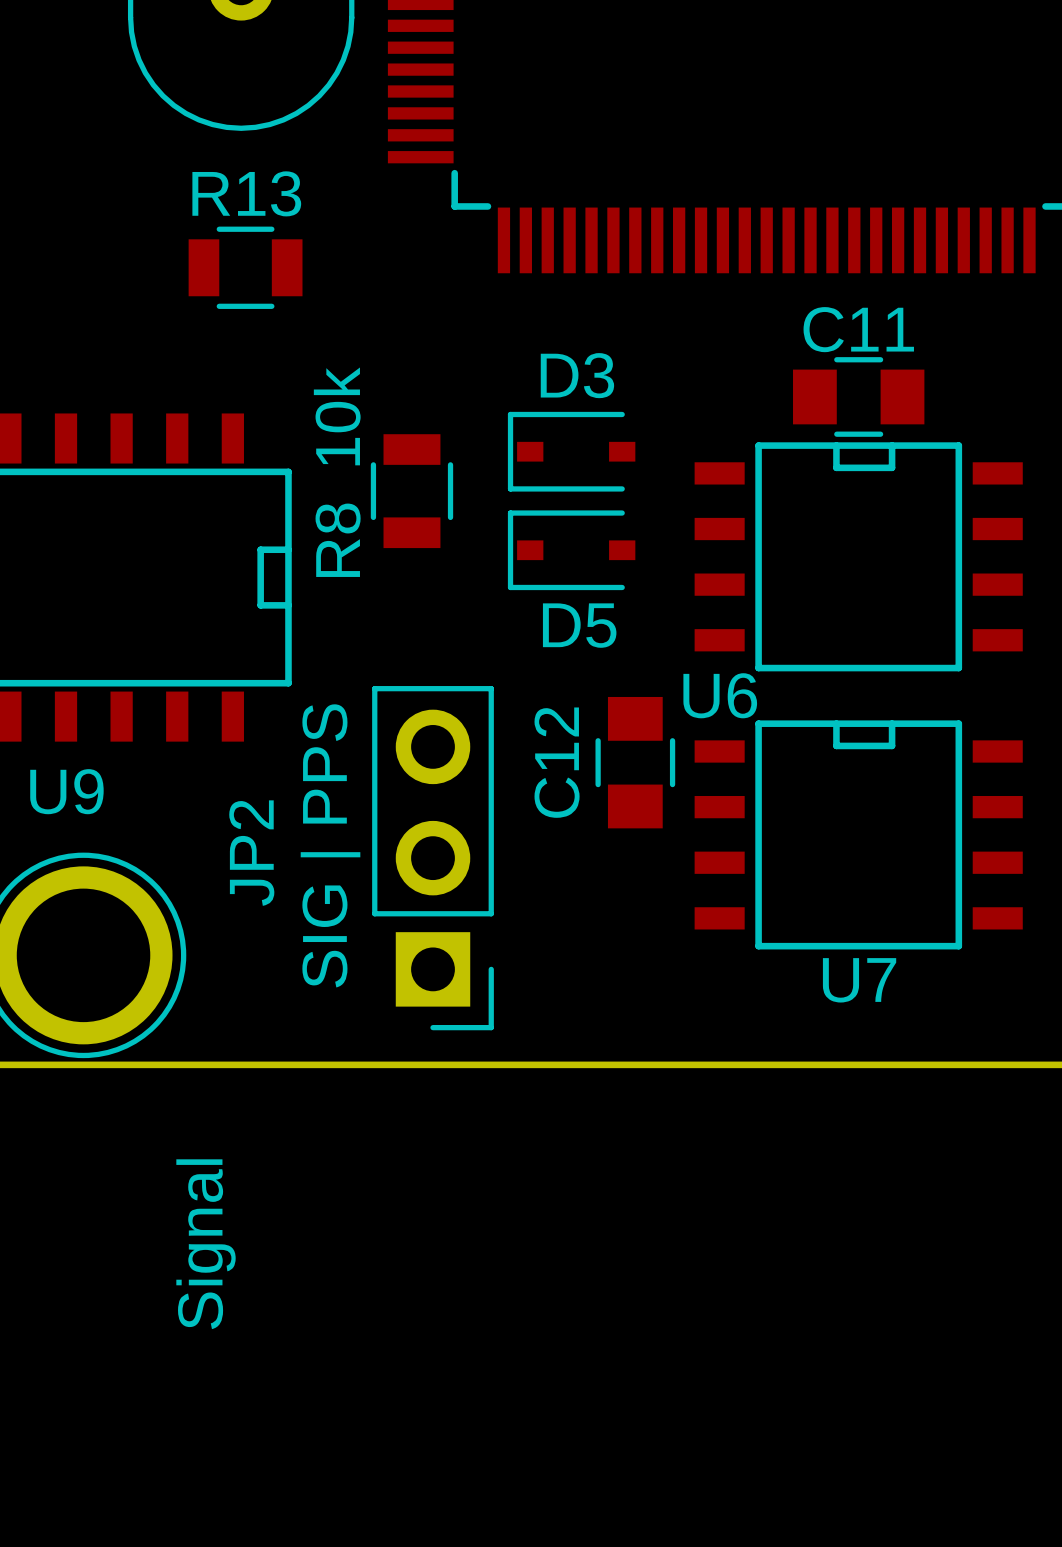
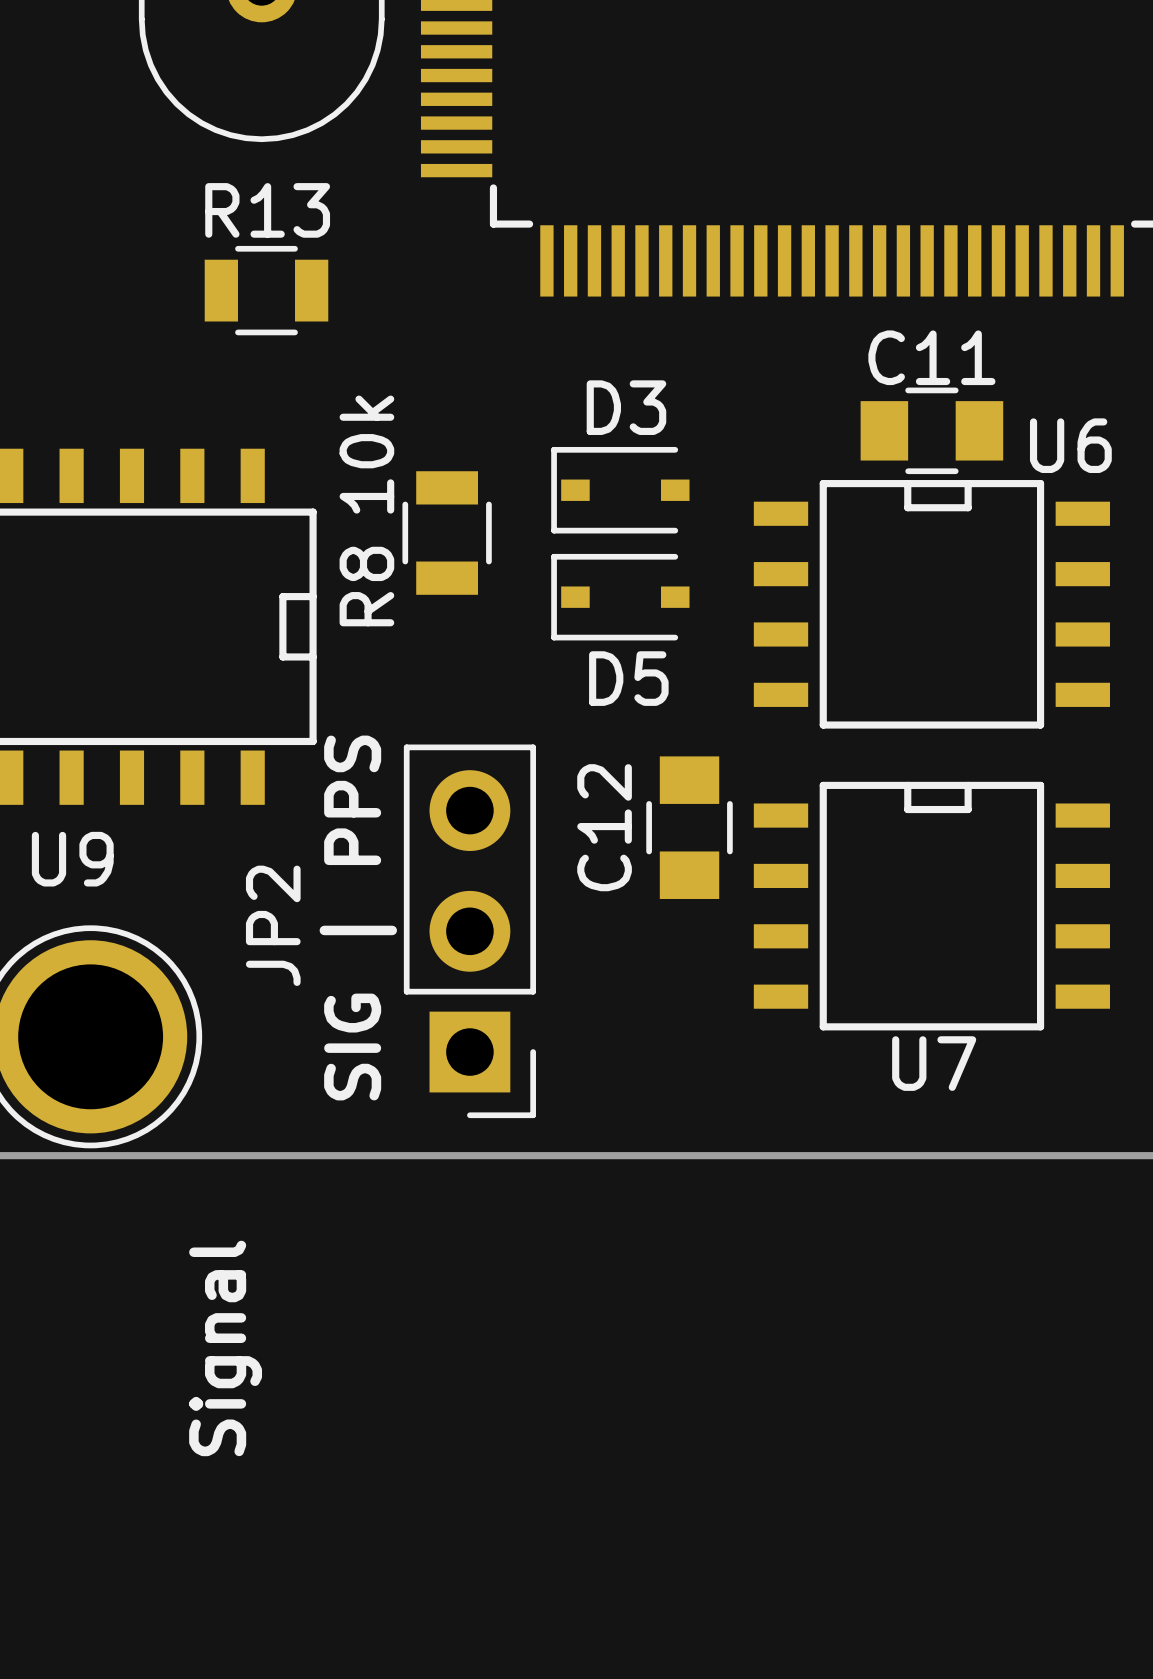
U6 name position: U6 (720, 695) -> U6 (1070, 445)

